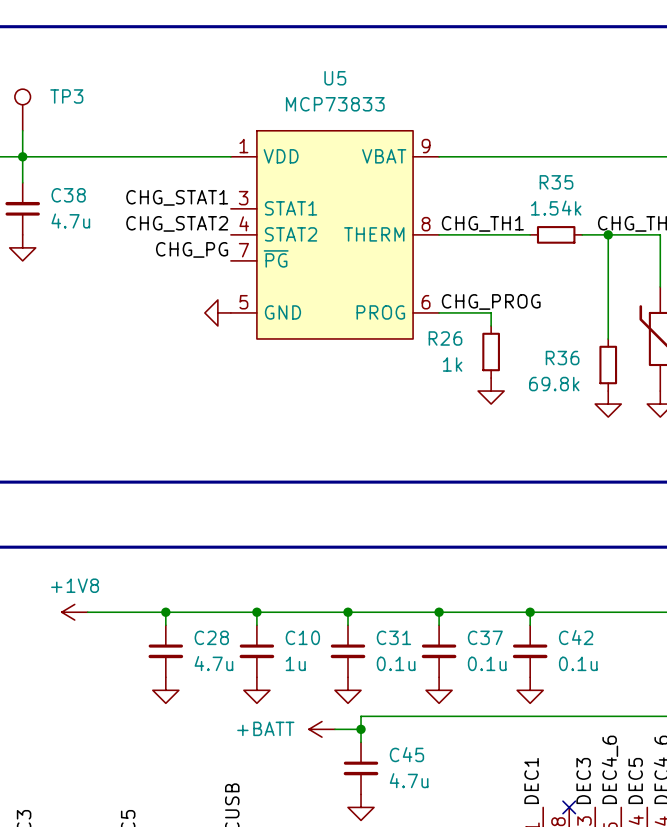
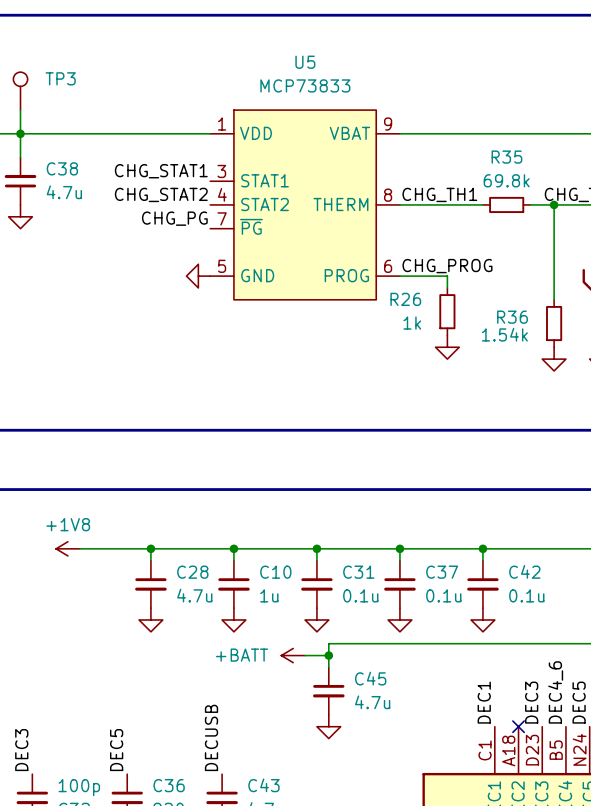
R35 value: 1.54k (556, 208) -> 69.8k (506, 180)
R36 value: 69.8k (554, 384) -> 1.54k (504, 334)

